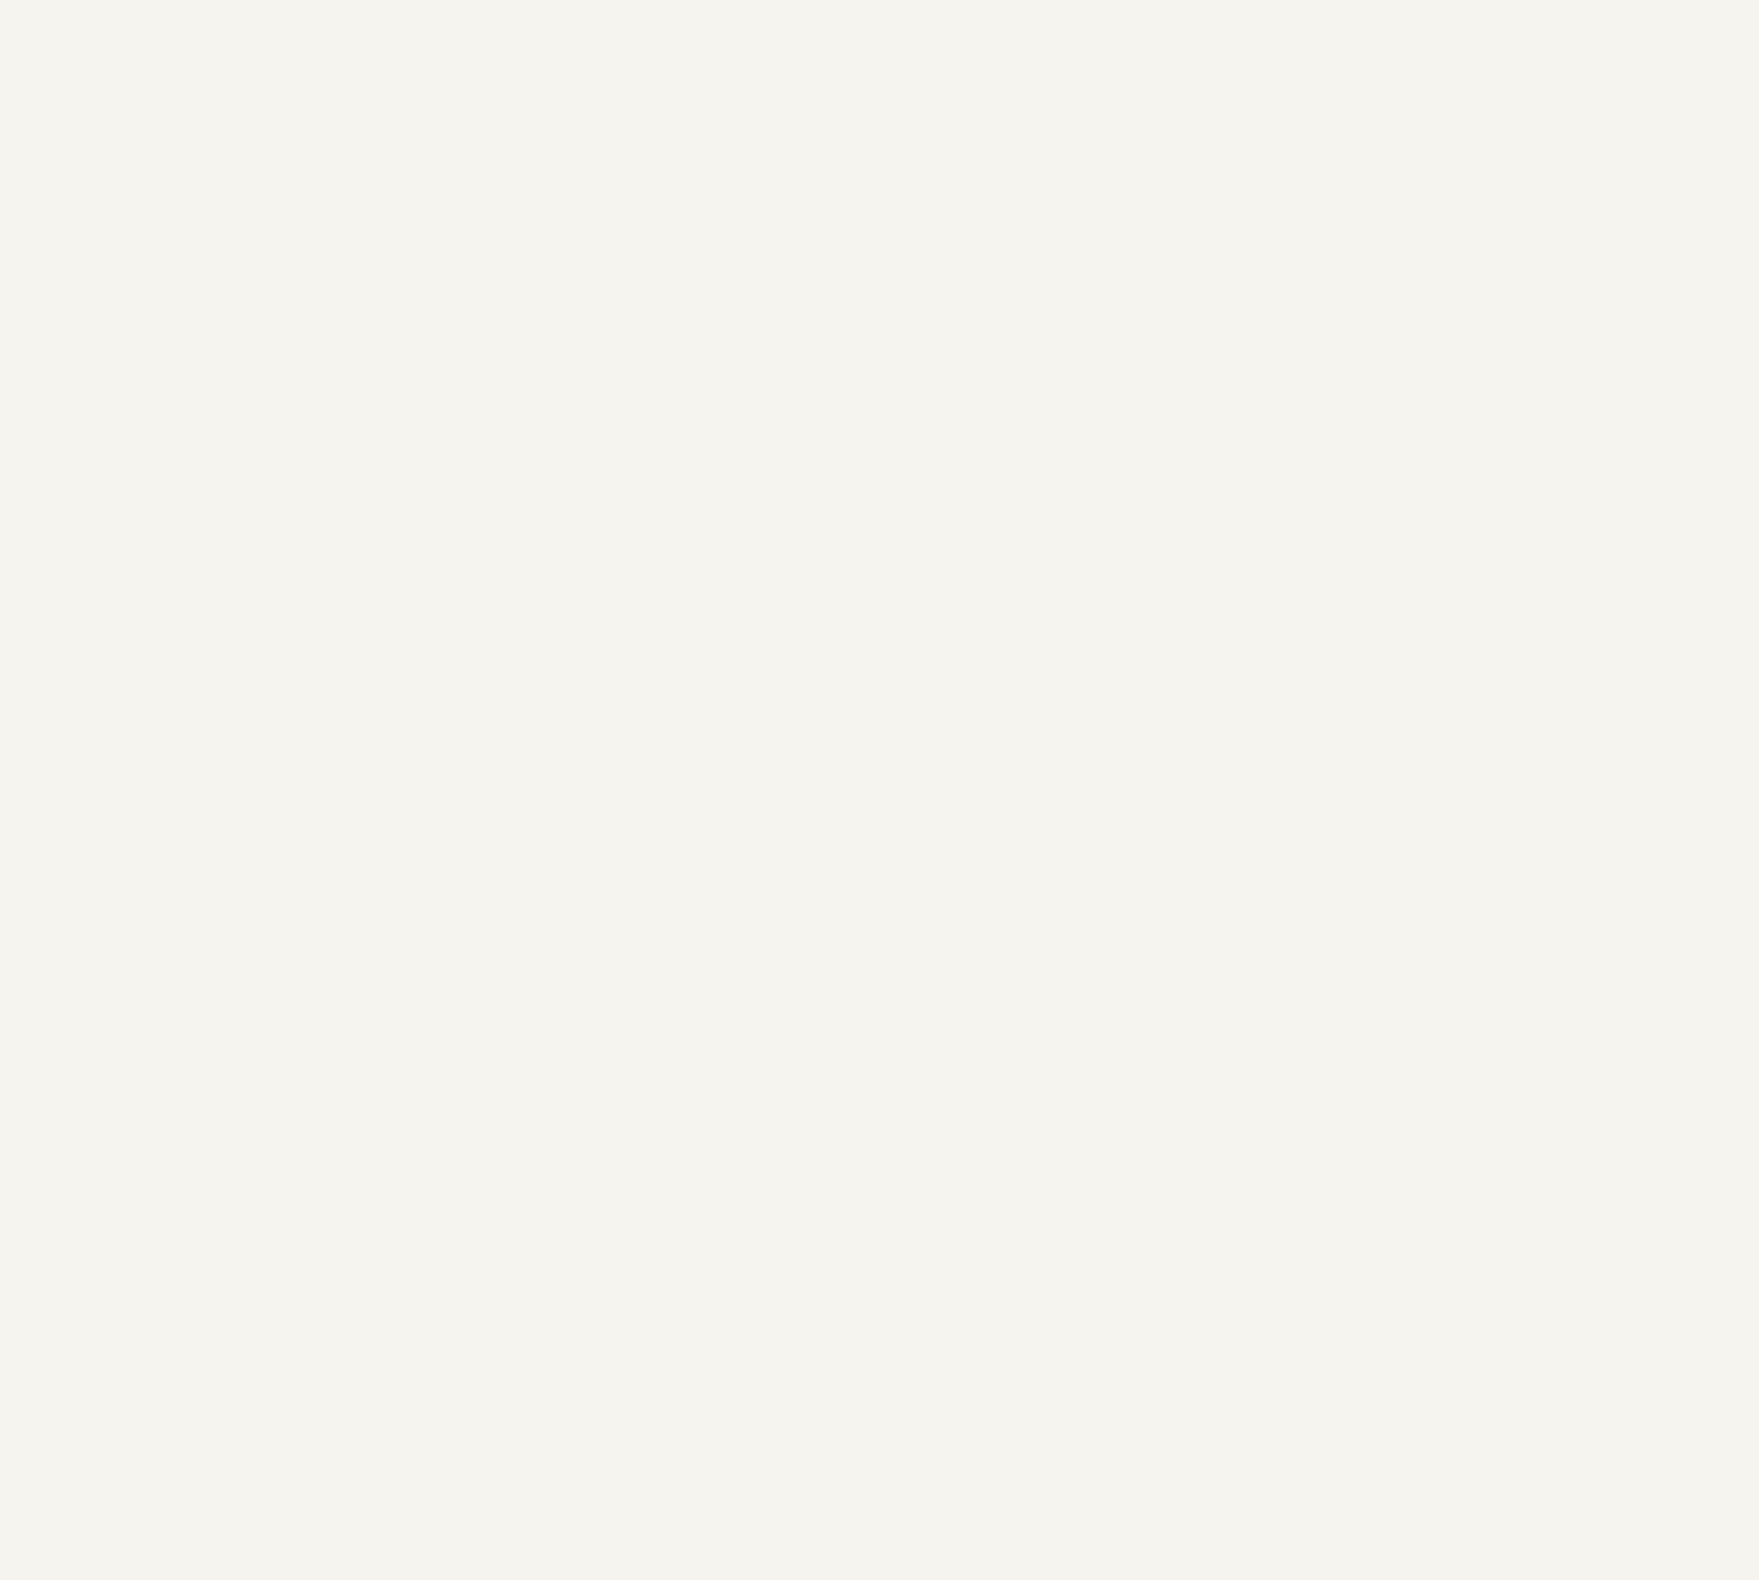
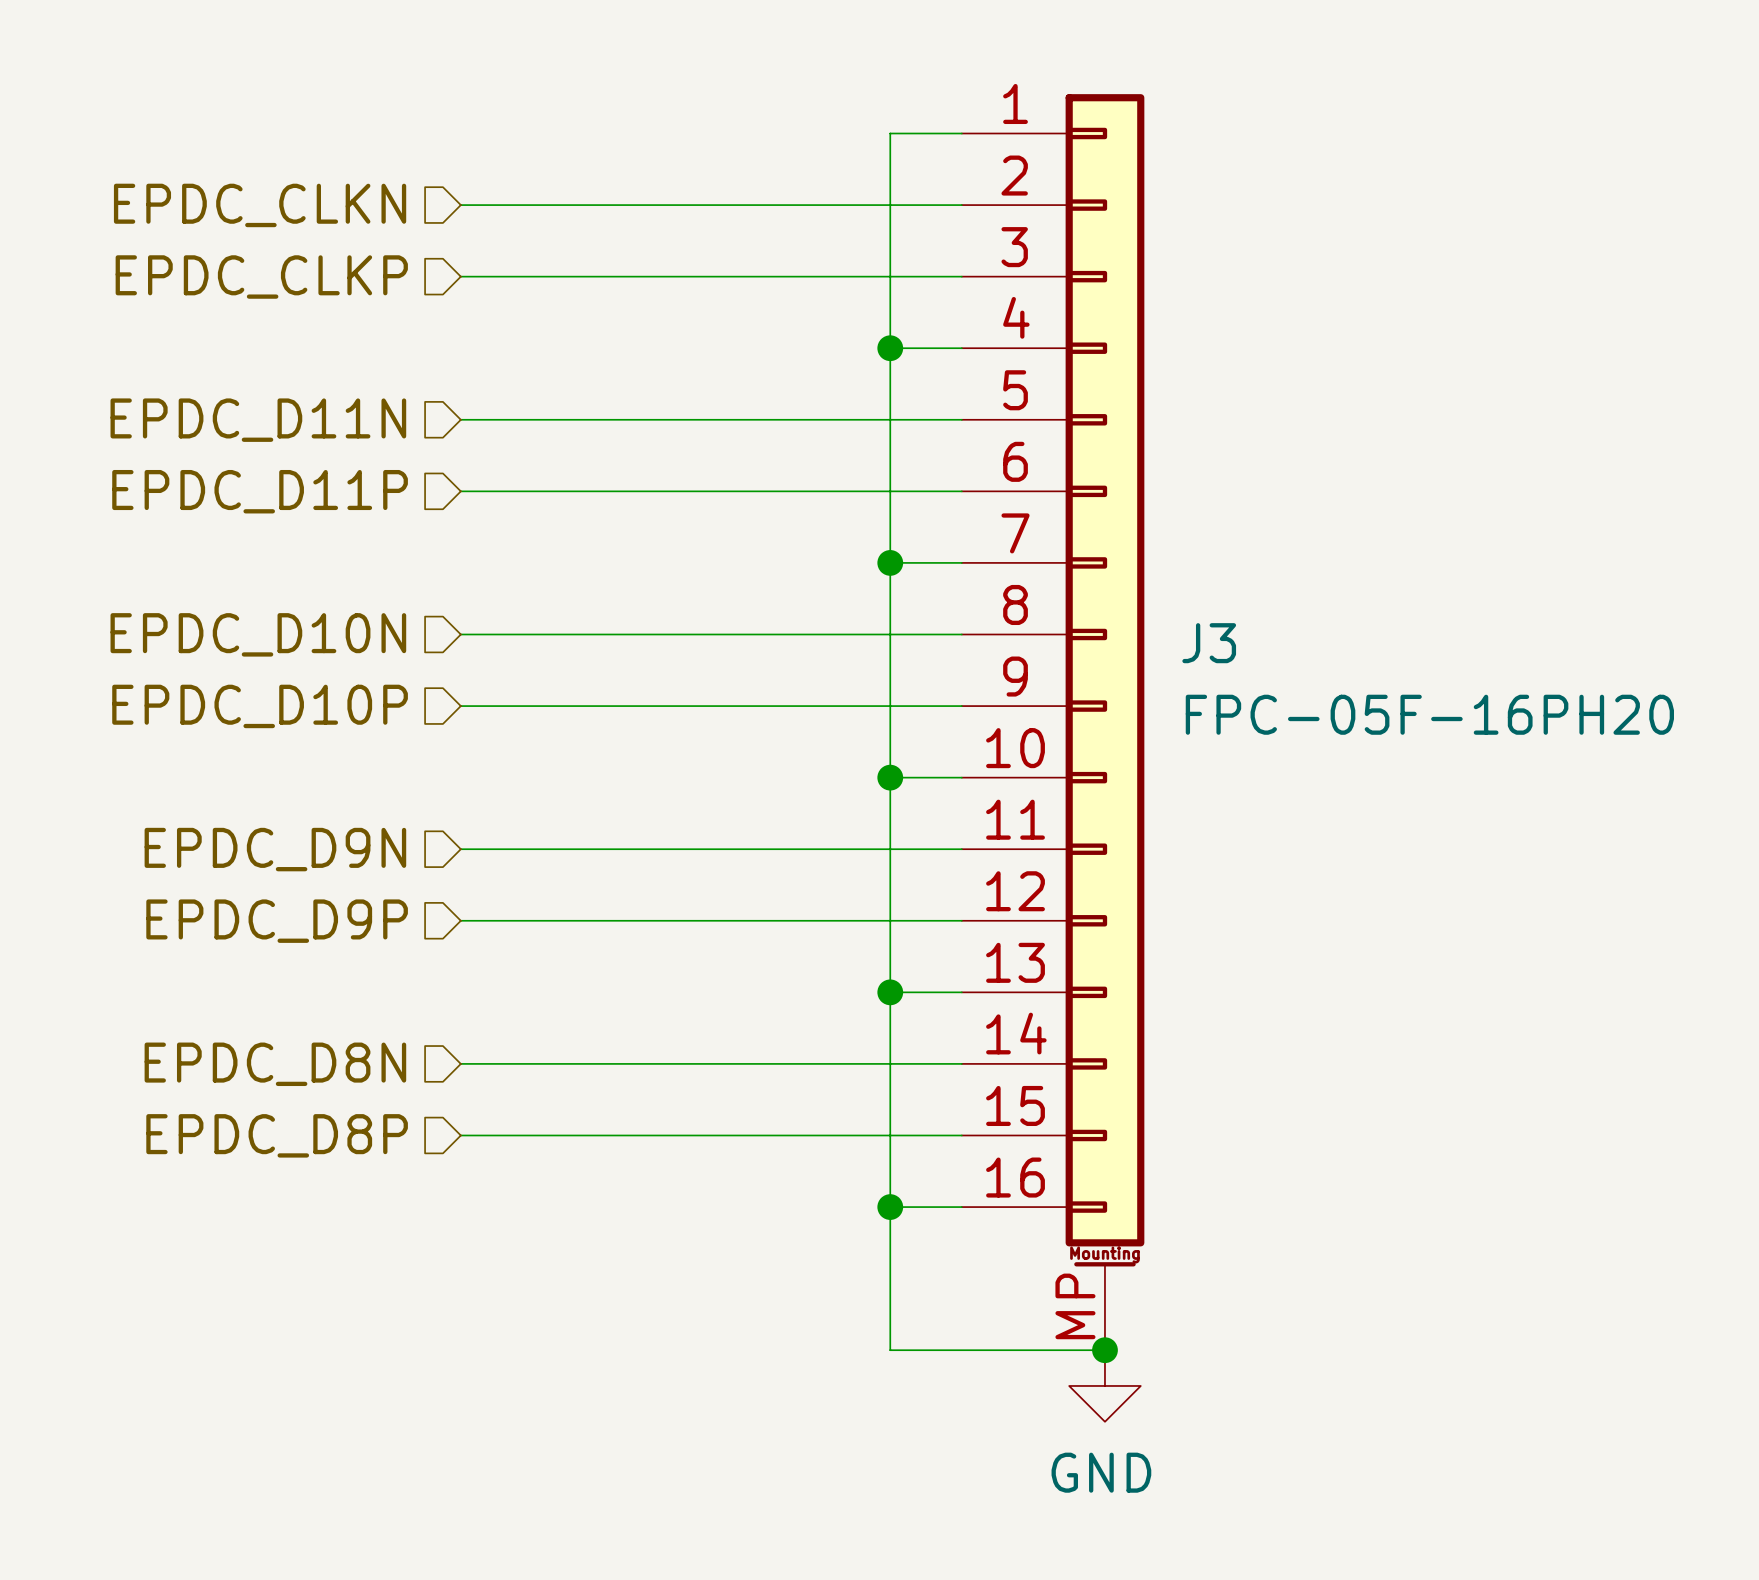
wire: none -> (961, 133) (890, 133) (890, 1350) (1104, 1350)
hierarchical label: none -> EPDC_CLKN (260, 205)
wire: none -> (460, 205) (961, 205)
wire: none -> (460, 276) (961, 276)
hierarchical label: none -> EPDC_CLKP (261, 277)
wire: none -> (890, 348) (961, 348)
junction: none -> (890, 348)
wire: none -> (460, 419) (961, 419)
hierarchical label: none -> EPDC_D11N (258, 420)
hierarchical label: none -> EPDC_D11P (260, 491)
wire: none -> (460, 491) (961, 491)
wire: none -> (890, 562) (961, 562)
junction: none -> (890, 562)
hierarchical label: none -> EPDC_D10N (258, 634)
wire: none -> (460, 634) (961, 634)
hierarchical label: none -> EPDC_D10P (260, 706)
wire: none -> (460, 706) (961, 706)
J3: none -> FPC-05F-16PH20 (1053, 722)
wire: none -> (890, 777) (961, 777)
junction: none -> (890, 777)
hierarchical label: none -> EPDC_D9N (275, 849)
wire: none -> (460, 849) (961, 849)
wire: none -> (460, 920) (961, 920)
hierarchical label: none -> EPDC_D9P (277, 921)
wire: none -> (890, 992) (961, 992)
junction: none -> (890, 992)
wire: none -> (460, 1063) (961, 1063)
hierarchical label: none -> EPDC_D8N (275, 1064)
hierarchical label: none -> EPDC_D8P (277, 1135)
wire: none -> (460, 1135) (961, 1135)
wire: none -> (890, 1207) (961, 1207)
junction: none -> (890, 1207)
junction: none -> (1104, 1350)
power symbol: none -> GND (1104, 1385)

